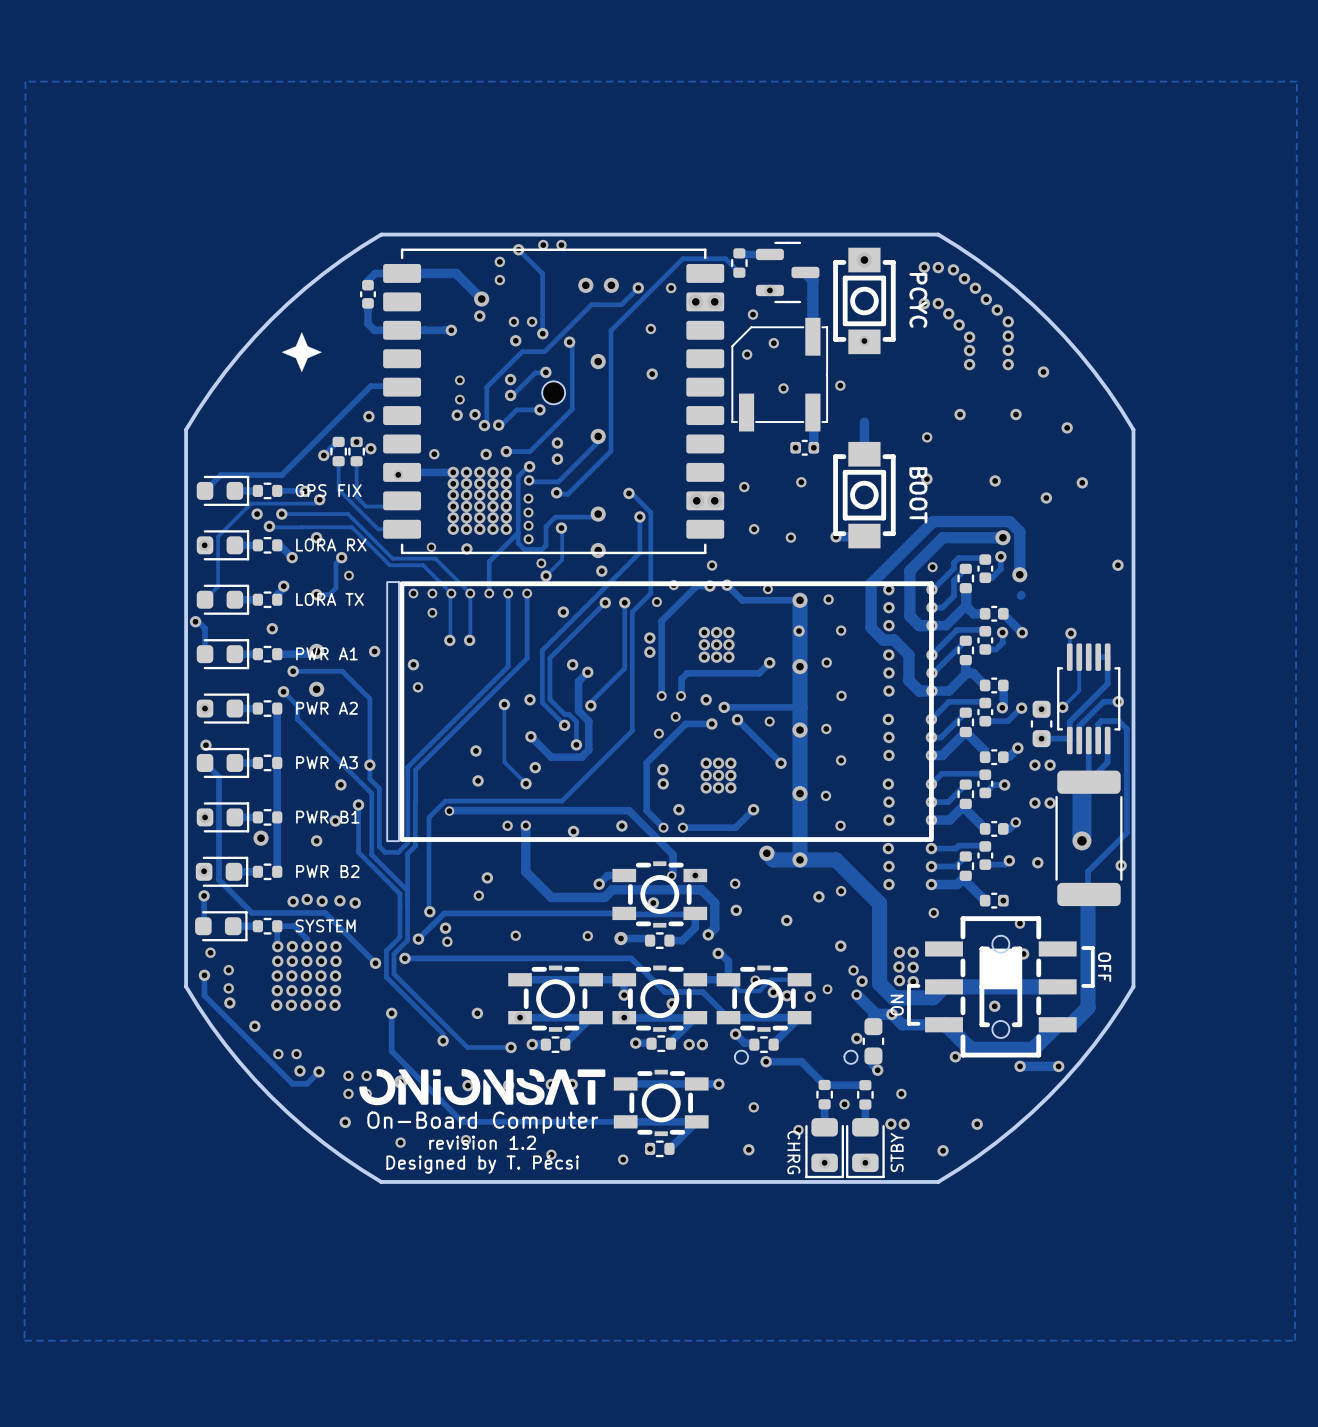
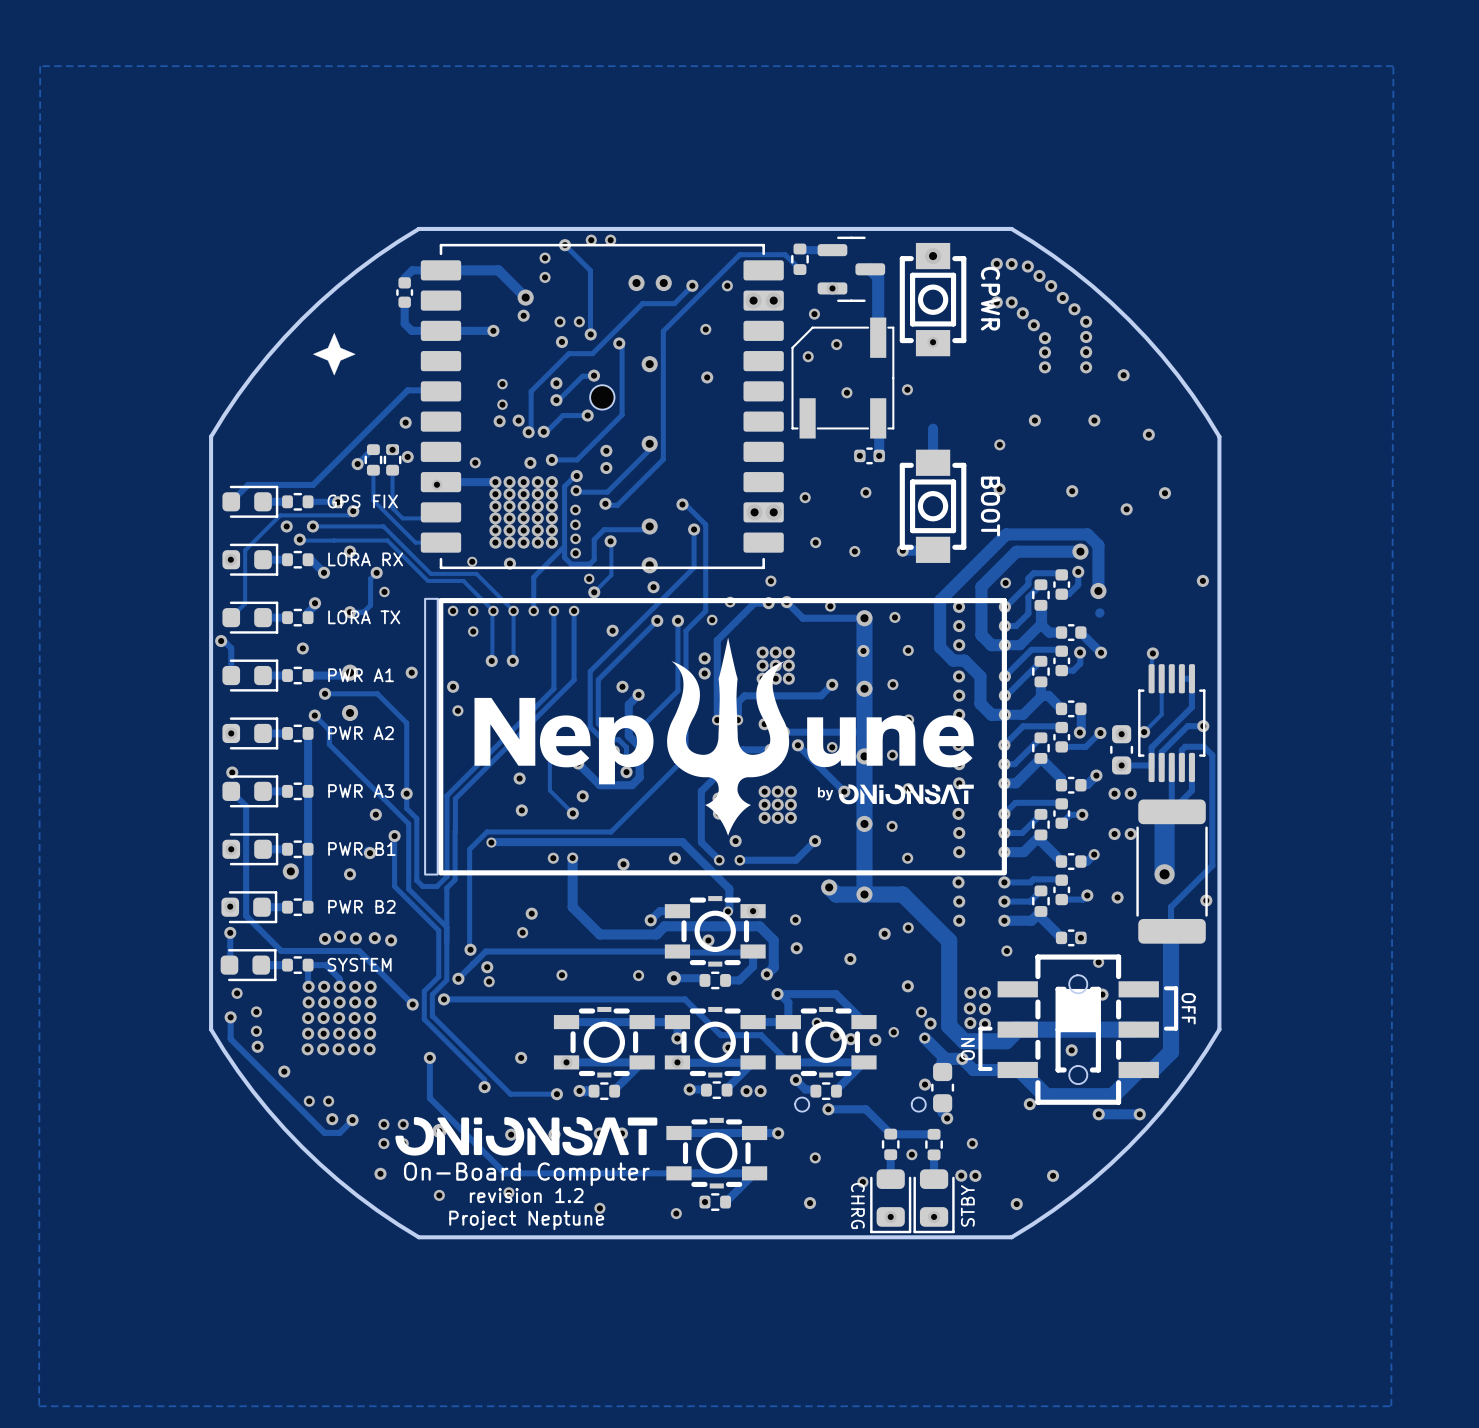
text: PCYC (918, 300) -> CPWR (990, 298)
drawing: none -> [474, 637, 974, 836]
track: (728, 979) (739, 991) (759, 991) (770, 979) (799, 979) -> (780, 994) (836, 994) (863, 1022)
text: Designed by T. Pécsi (482, 1164) -> Project Neptune (526, 1220)

